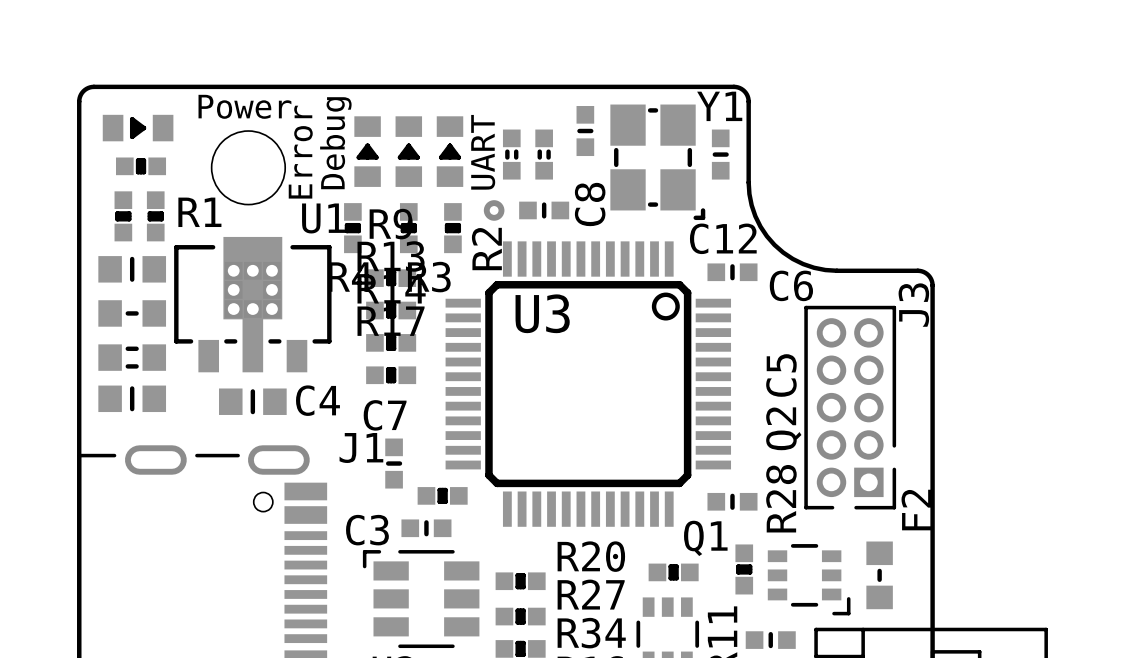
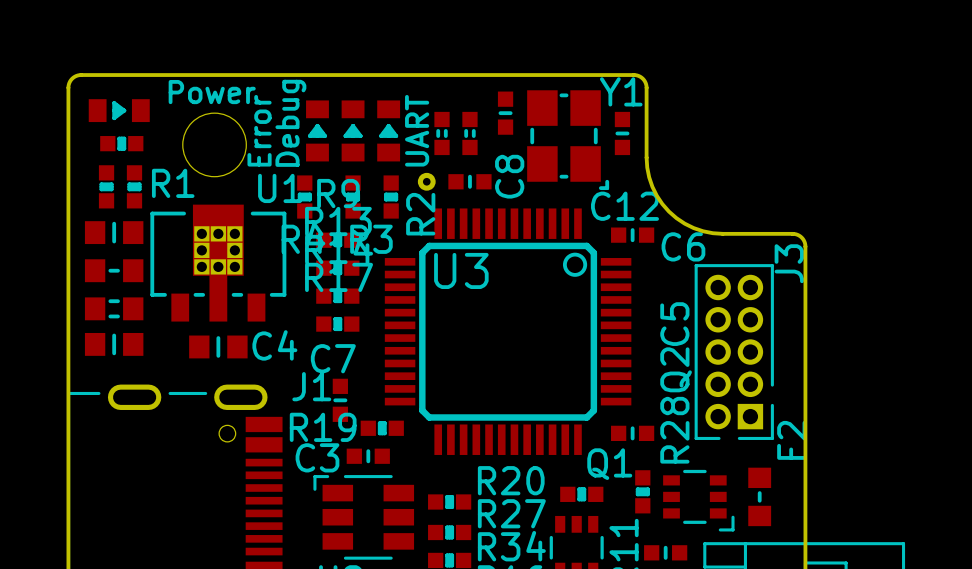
R19 name: none -> R19 (323, 427)

